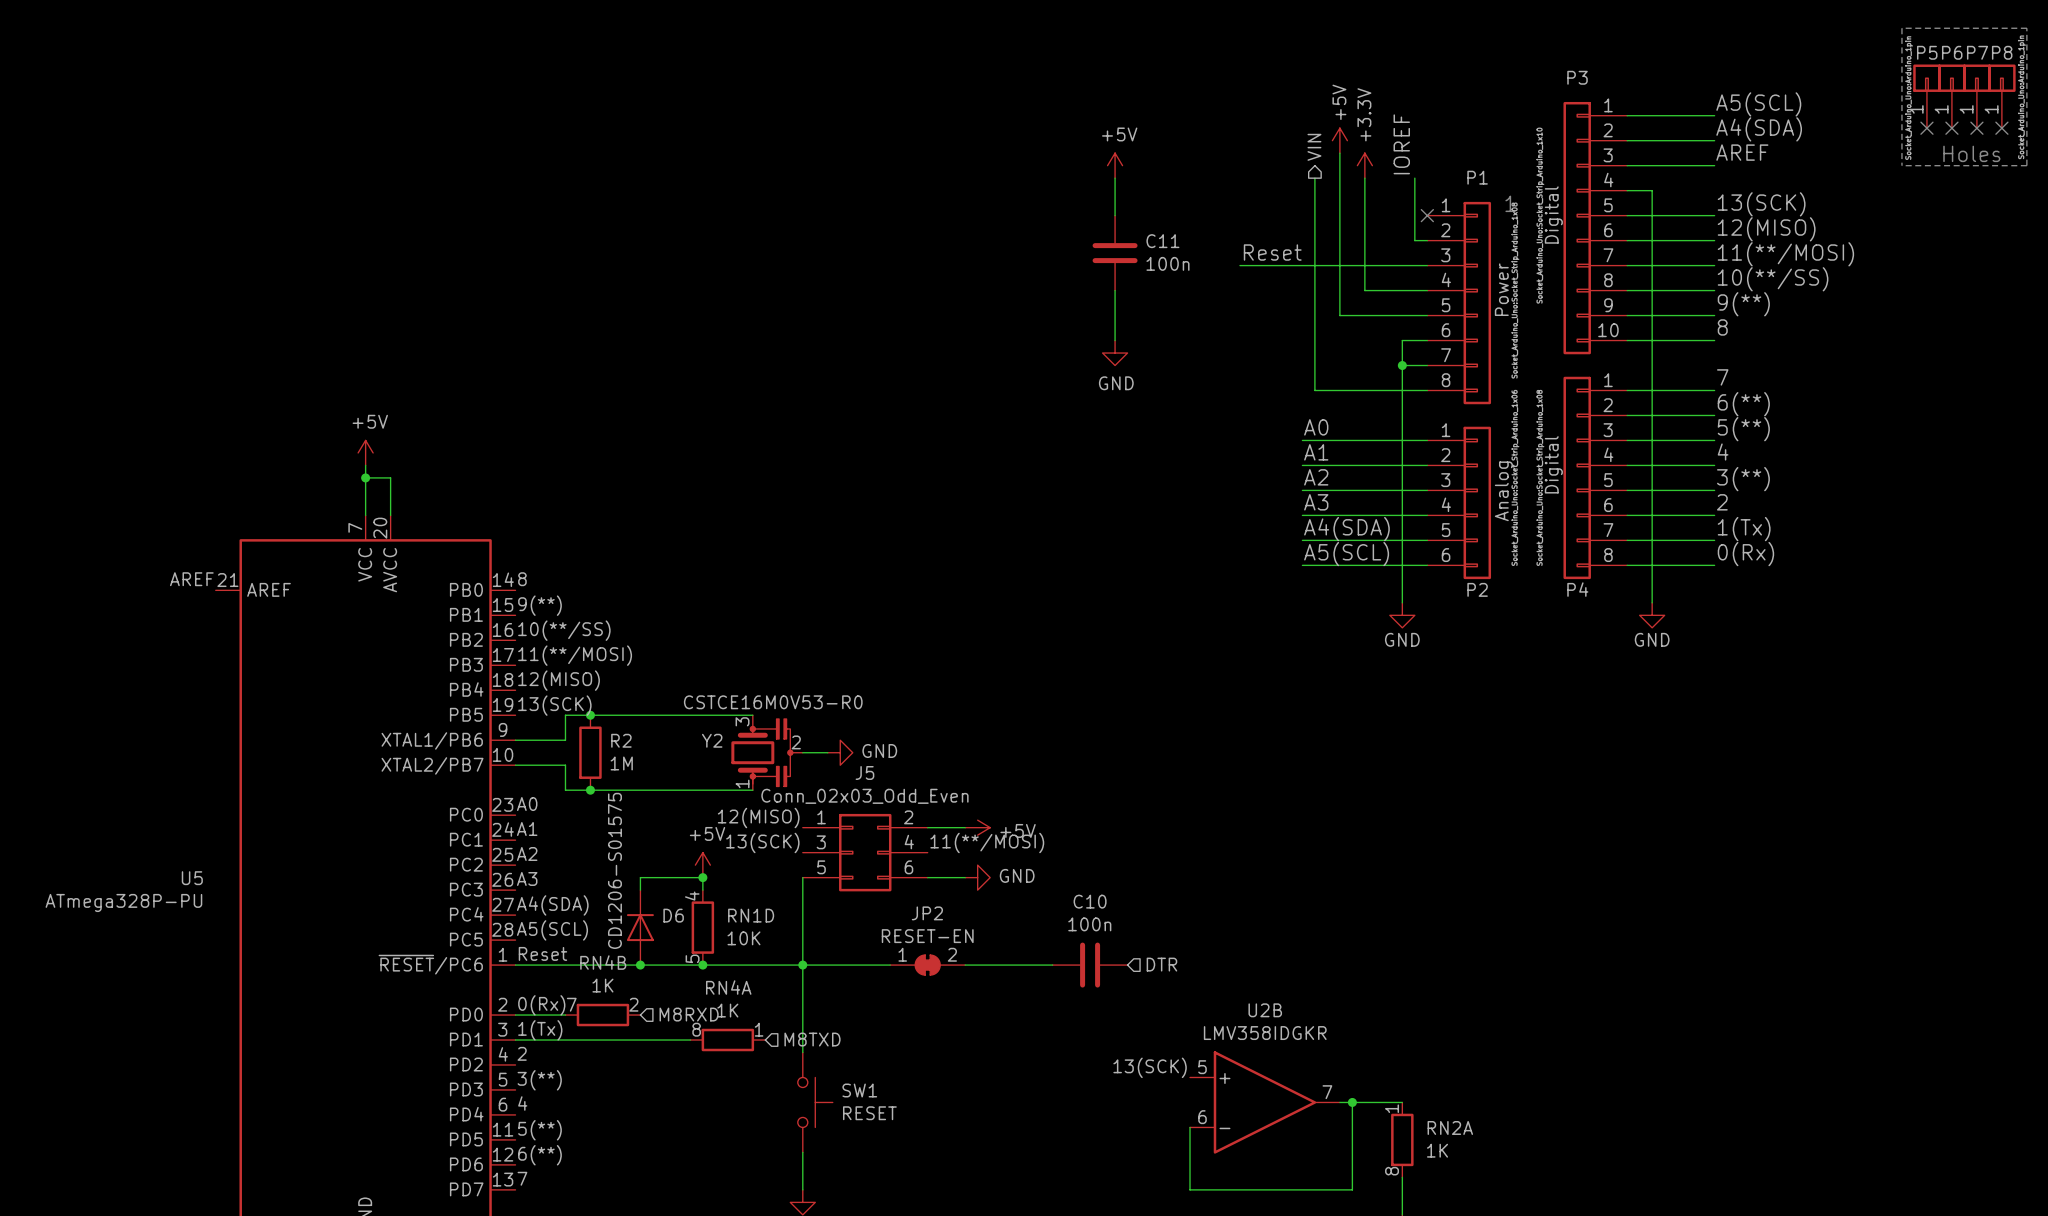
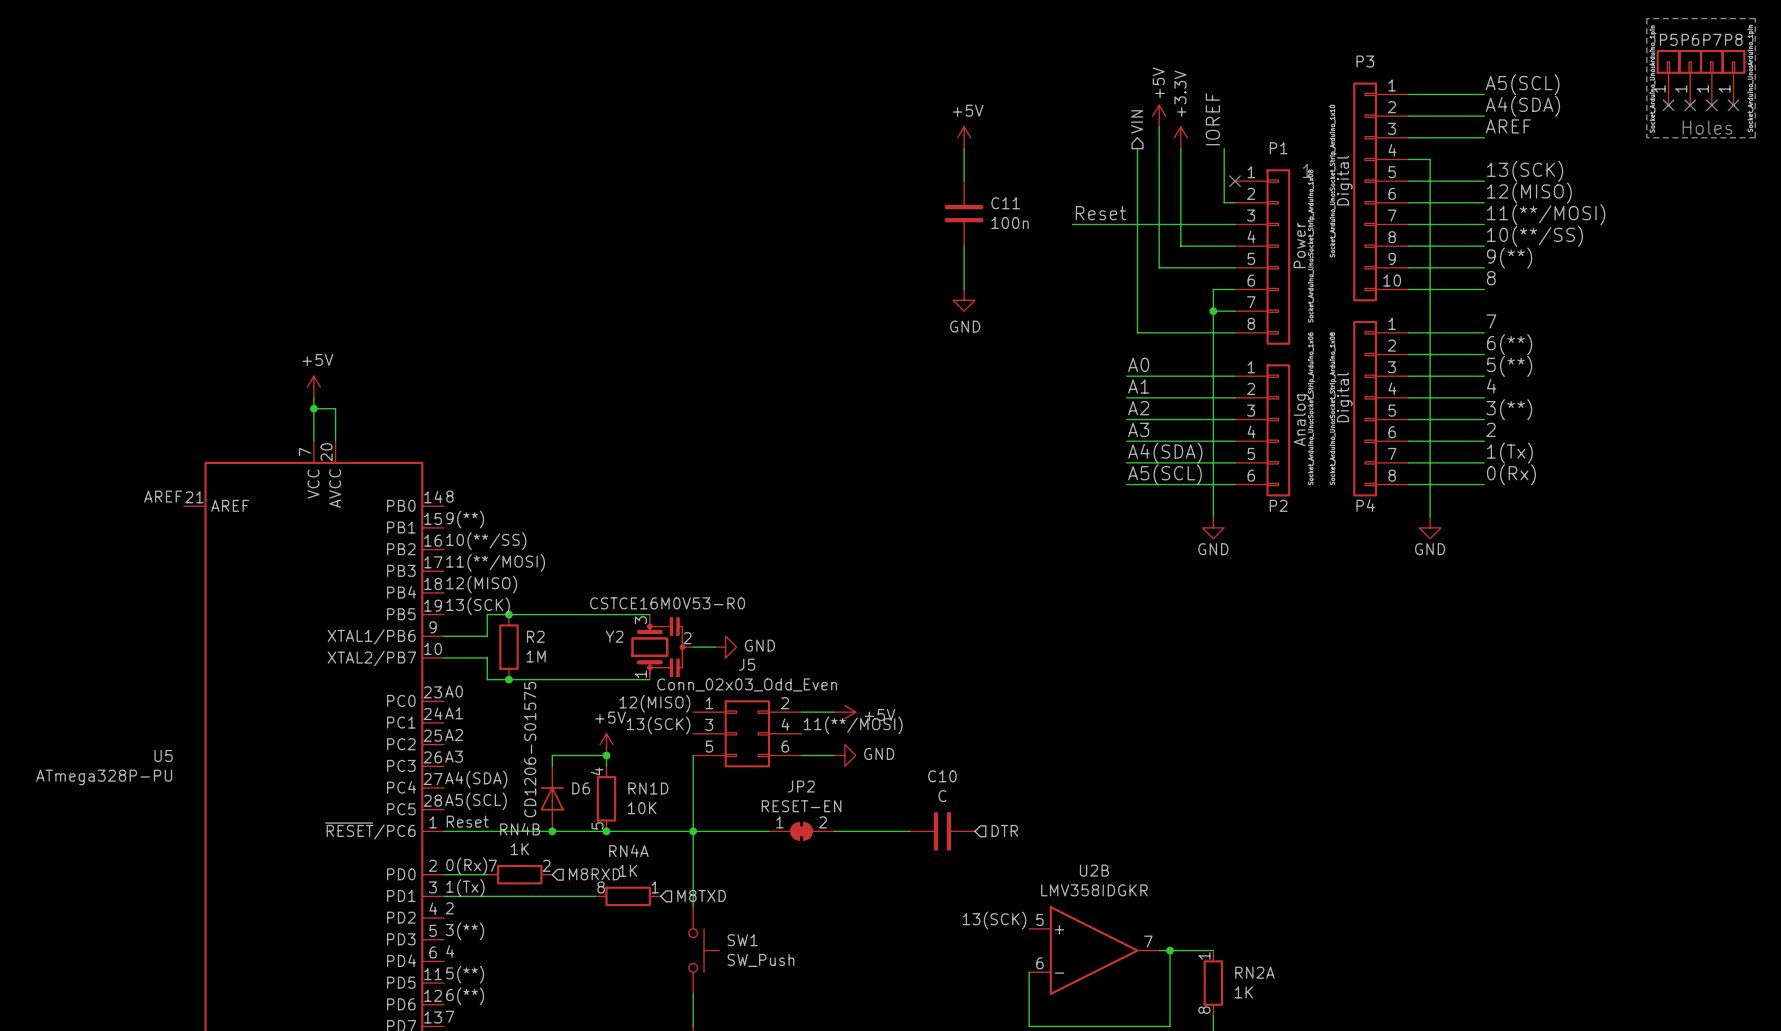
C10 value: 100n (1089, 924) -> C (942, 796)
SW1 value: RESET (869, 1113) -> SW_Push (760, 960)

